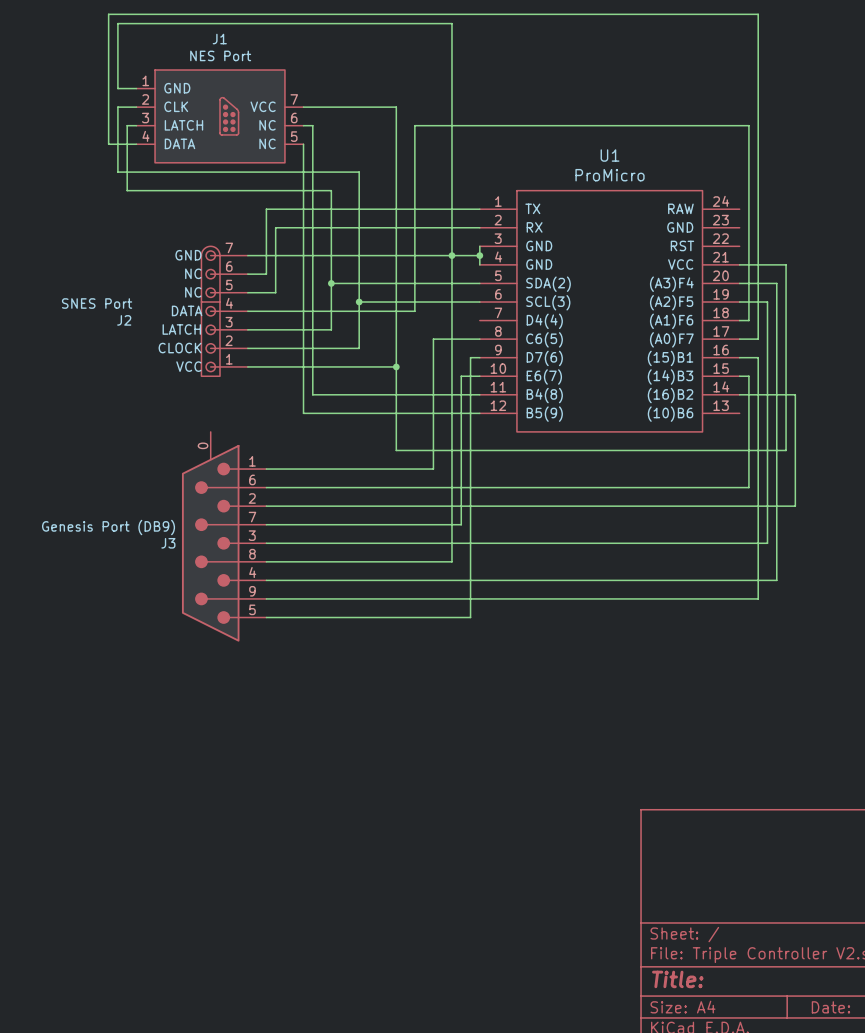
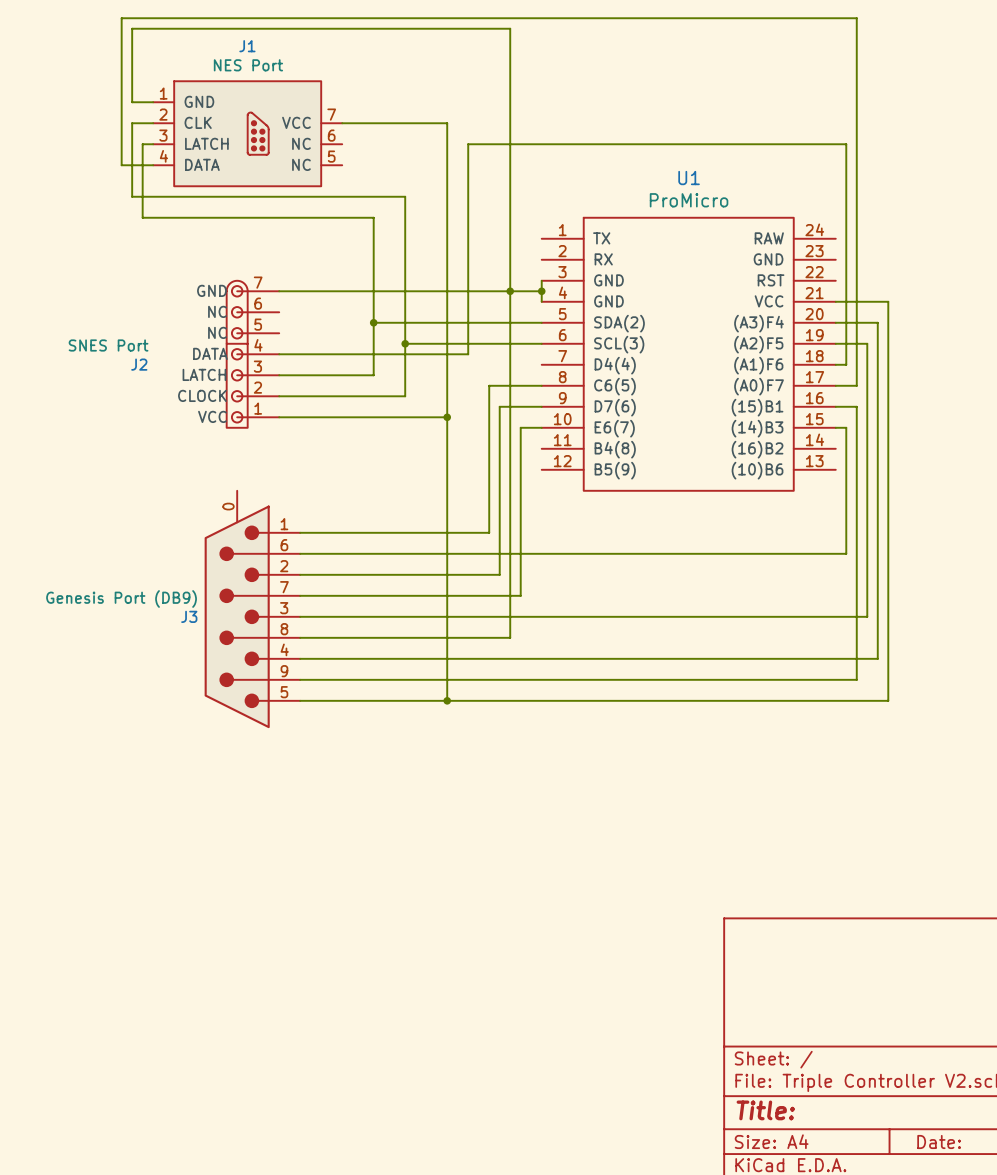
wire: (303, 125) (312, 125) (312, 394) (479, 394) -> none
wire: (303, 144) (303, 413) (479, 413) -> none
wire: (479, 209) (266, 209) (266, 274) (247, 274) -> none
wire: (479, 227) (275, 227) (275, 292) (247, 292) -> none
wire: (470, 357) (470, 617) -> (531, 406) (499, 406) (499, 574)
wire: (739, 394) (795, 394) (795, 506) (442, 506) -> none
wire: (396, 450) (786, 450) -> (531, 700) (888, 700) (888, 511)
wire: none -> (447, 511) (447, 700)
junction: none -> (447, 700)

